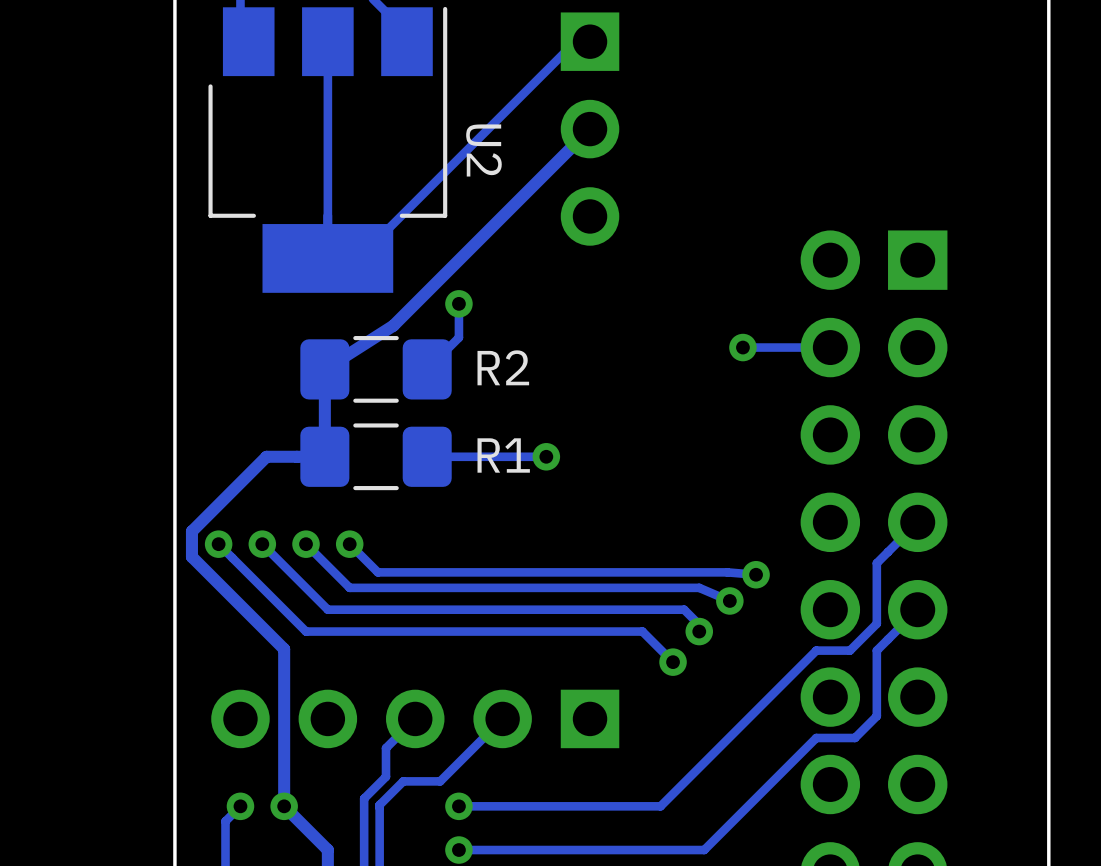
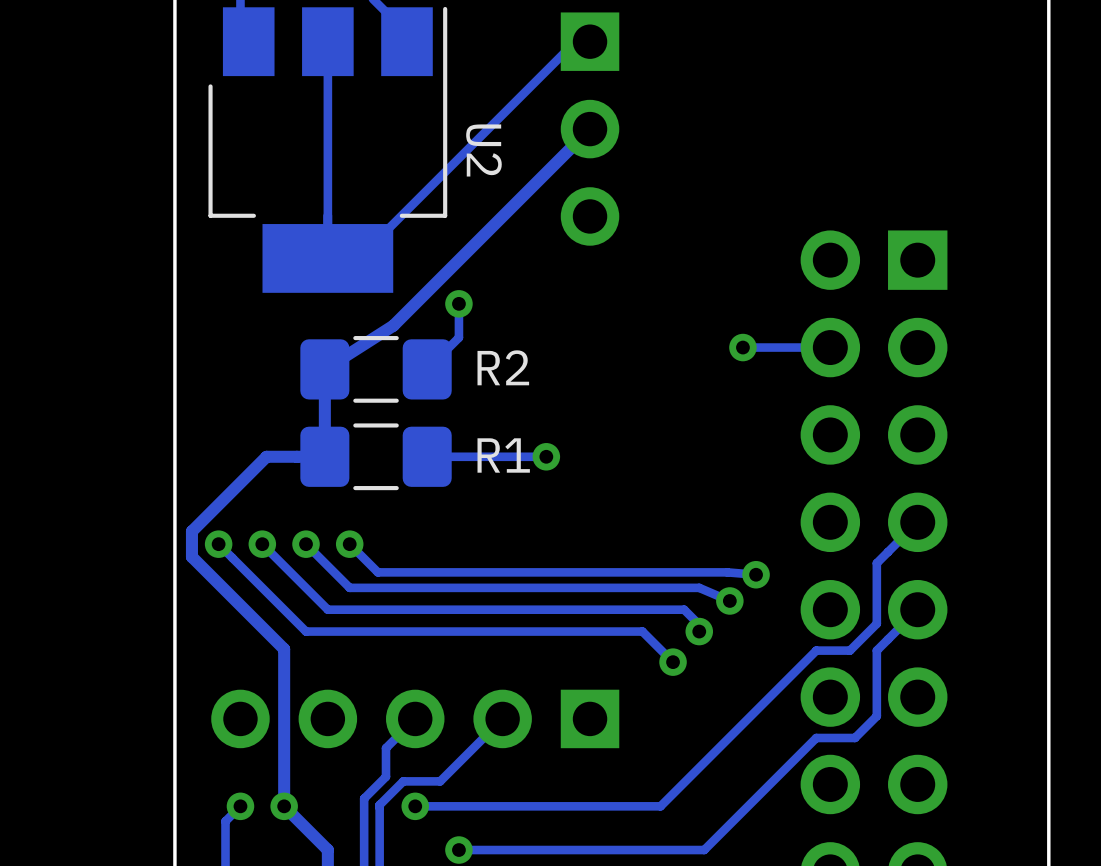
track: none -> (458, 806) (415, 806)
via position: (458, 806) -> (415, 806)

